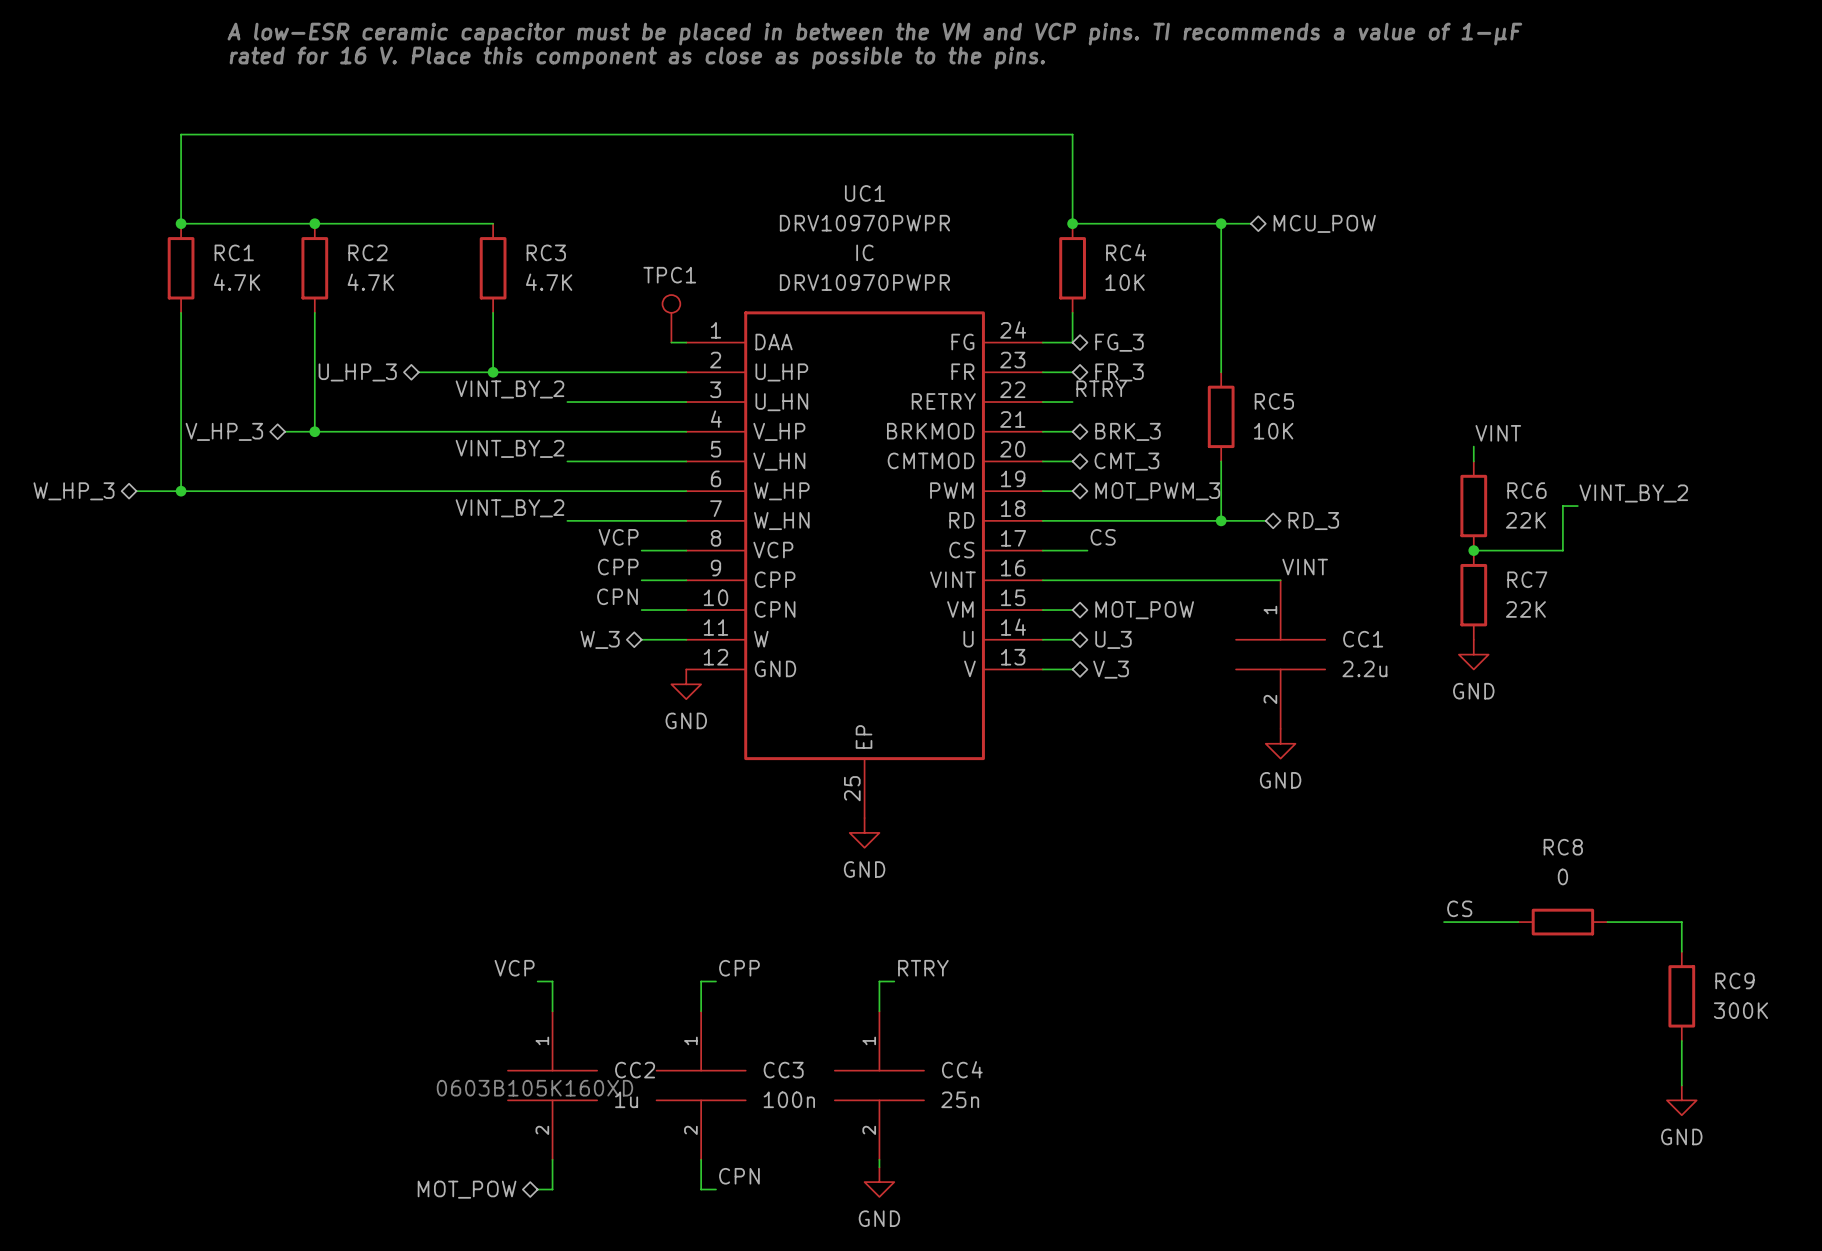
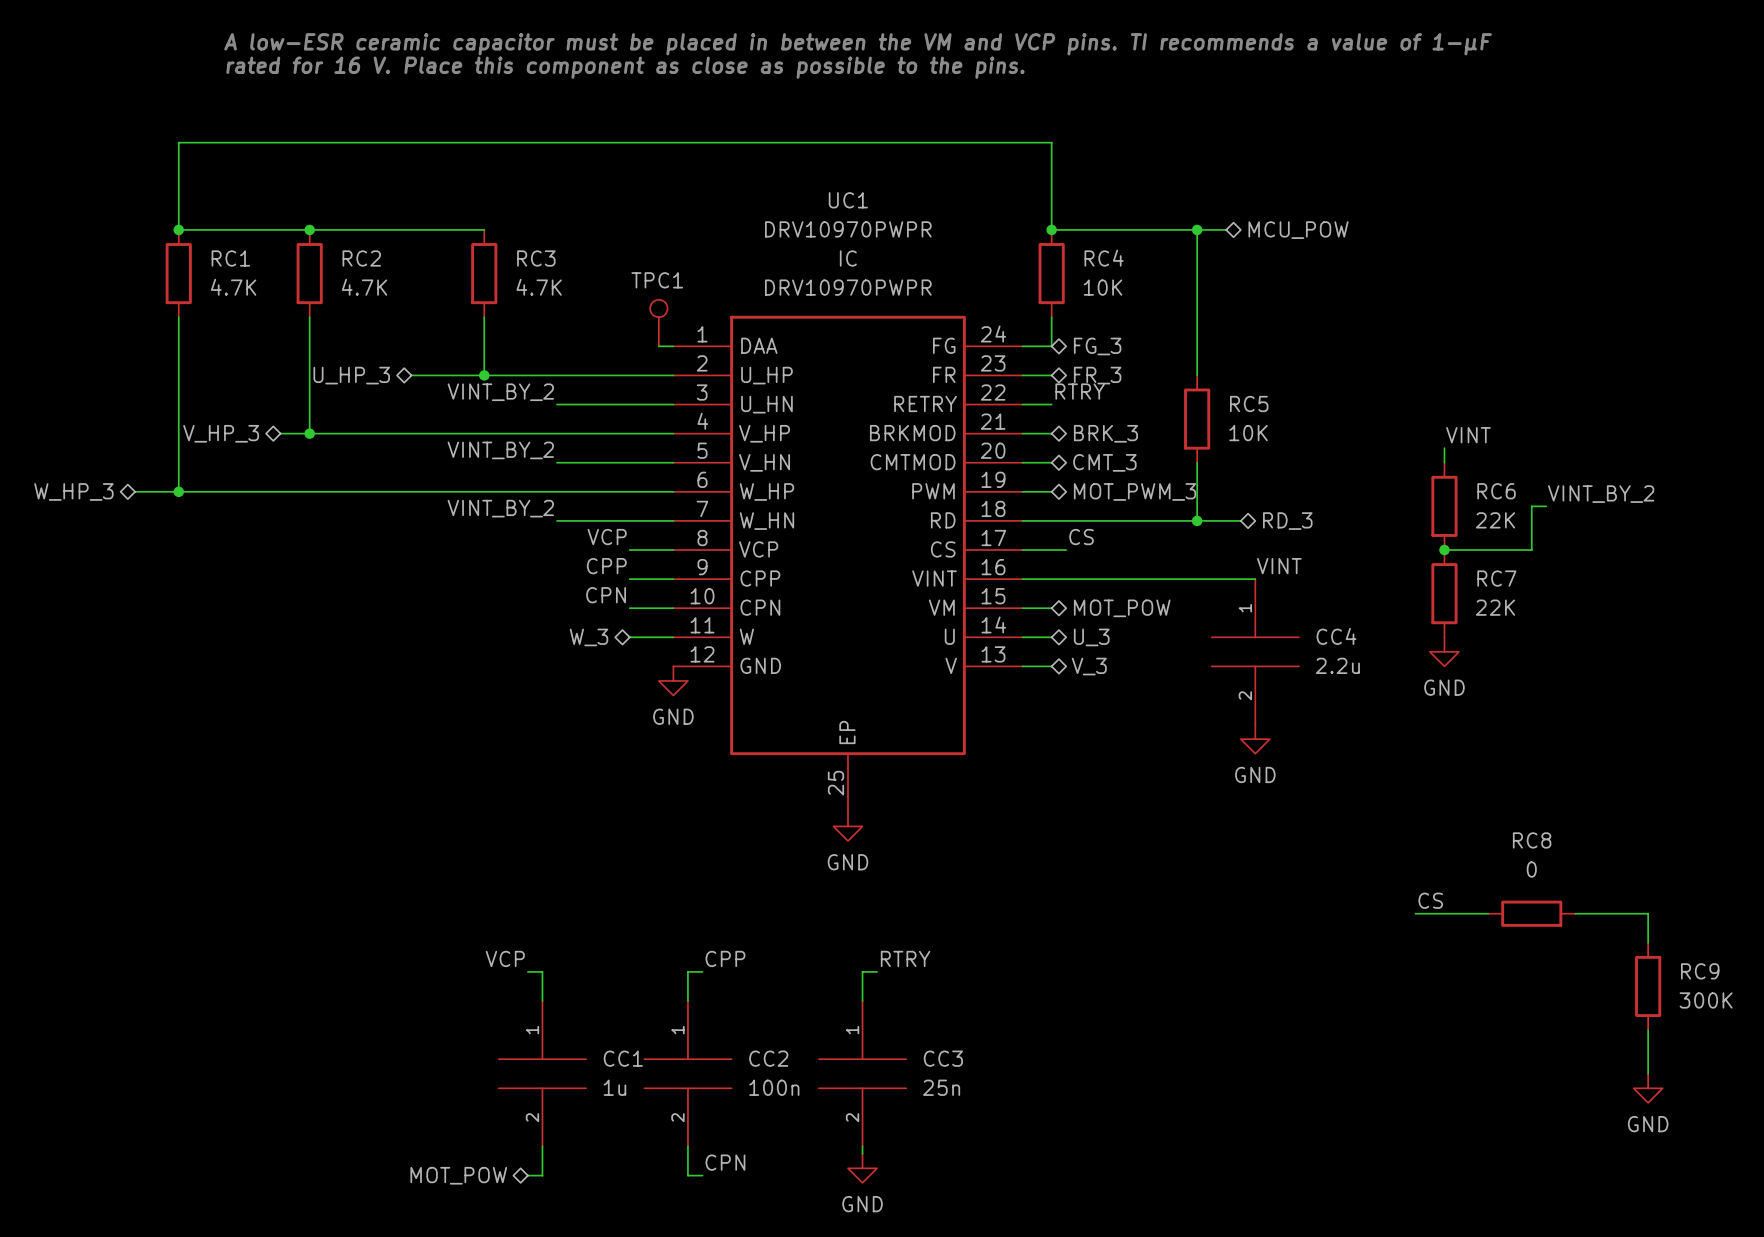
CC1 name: CC1 (1363, 639) -> CC4 (1336, 636)
CC4 name: CC4 (962, 1069) -> CC3 (943, 1058)
CC2 name: CC2 (635, 1070) -> CC1 (623, 1058)
CC3 name: CC3 (783, 1070) -> CC2 (768, 1058)
text: 0603B105K160XD (534, 1088) -> none

